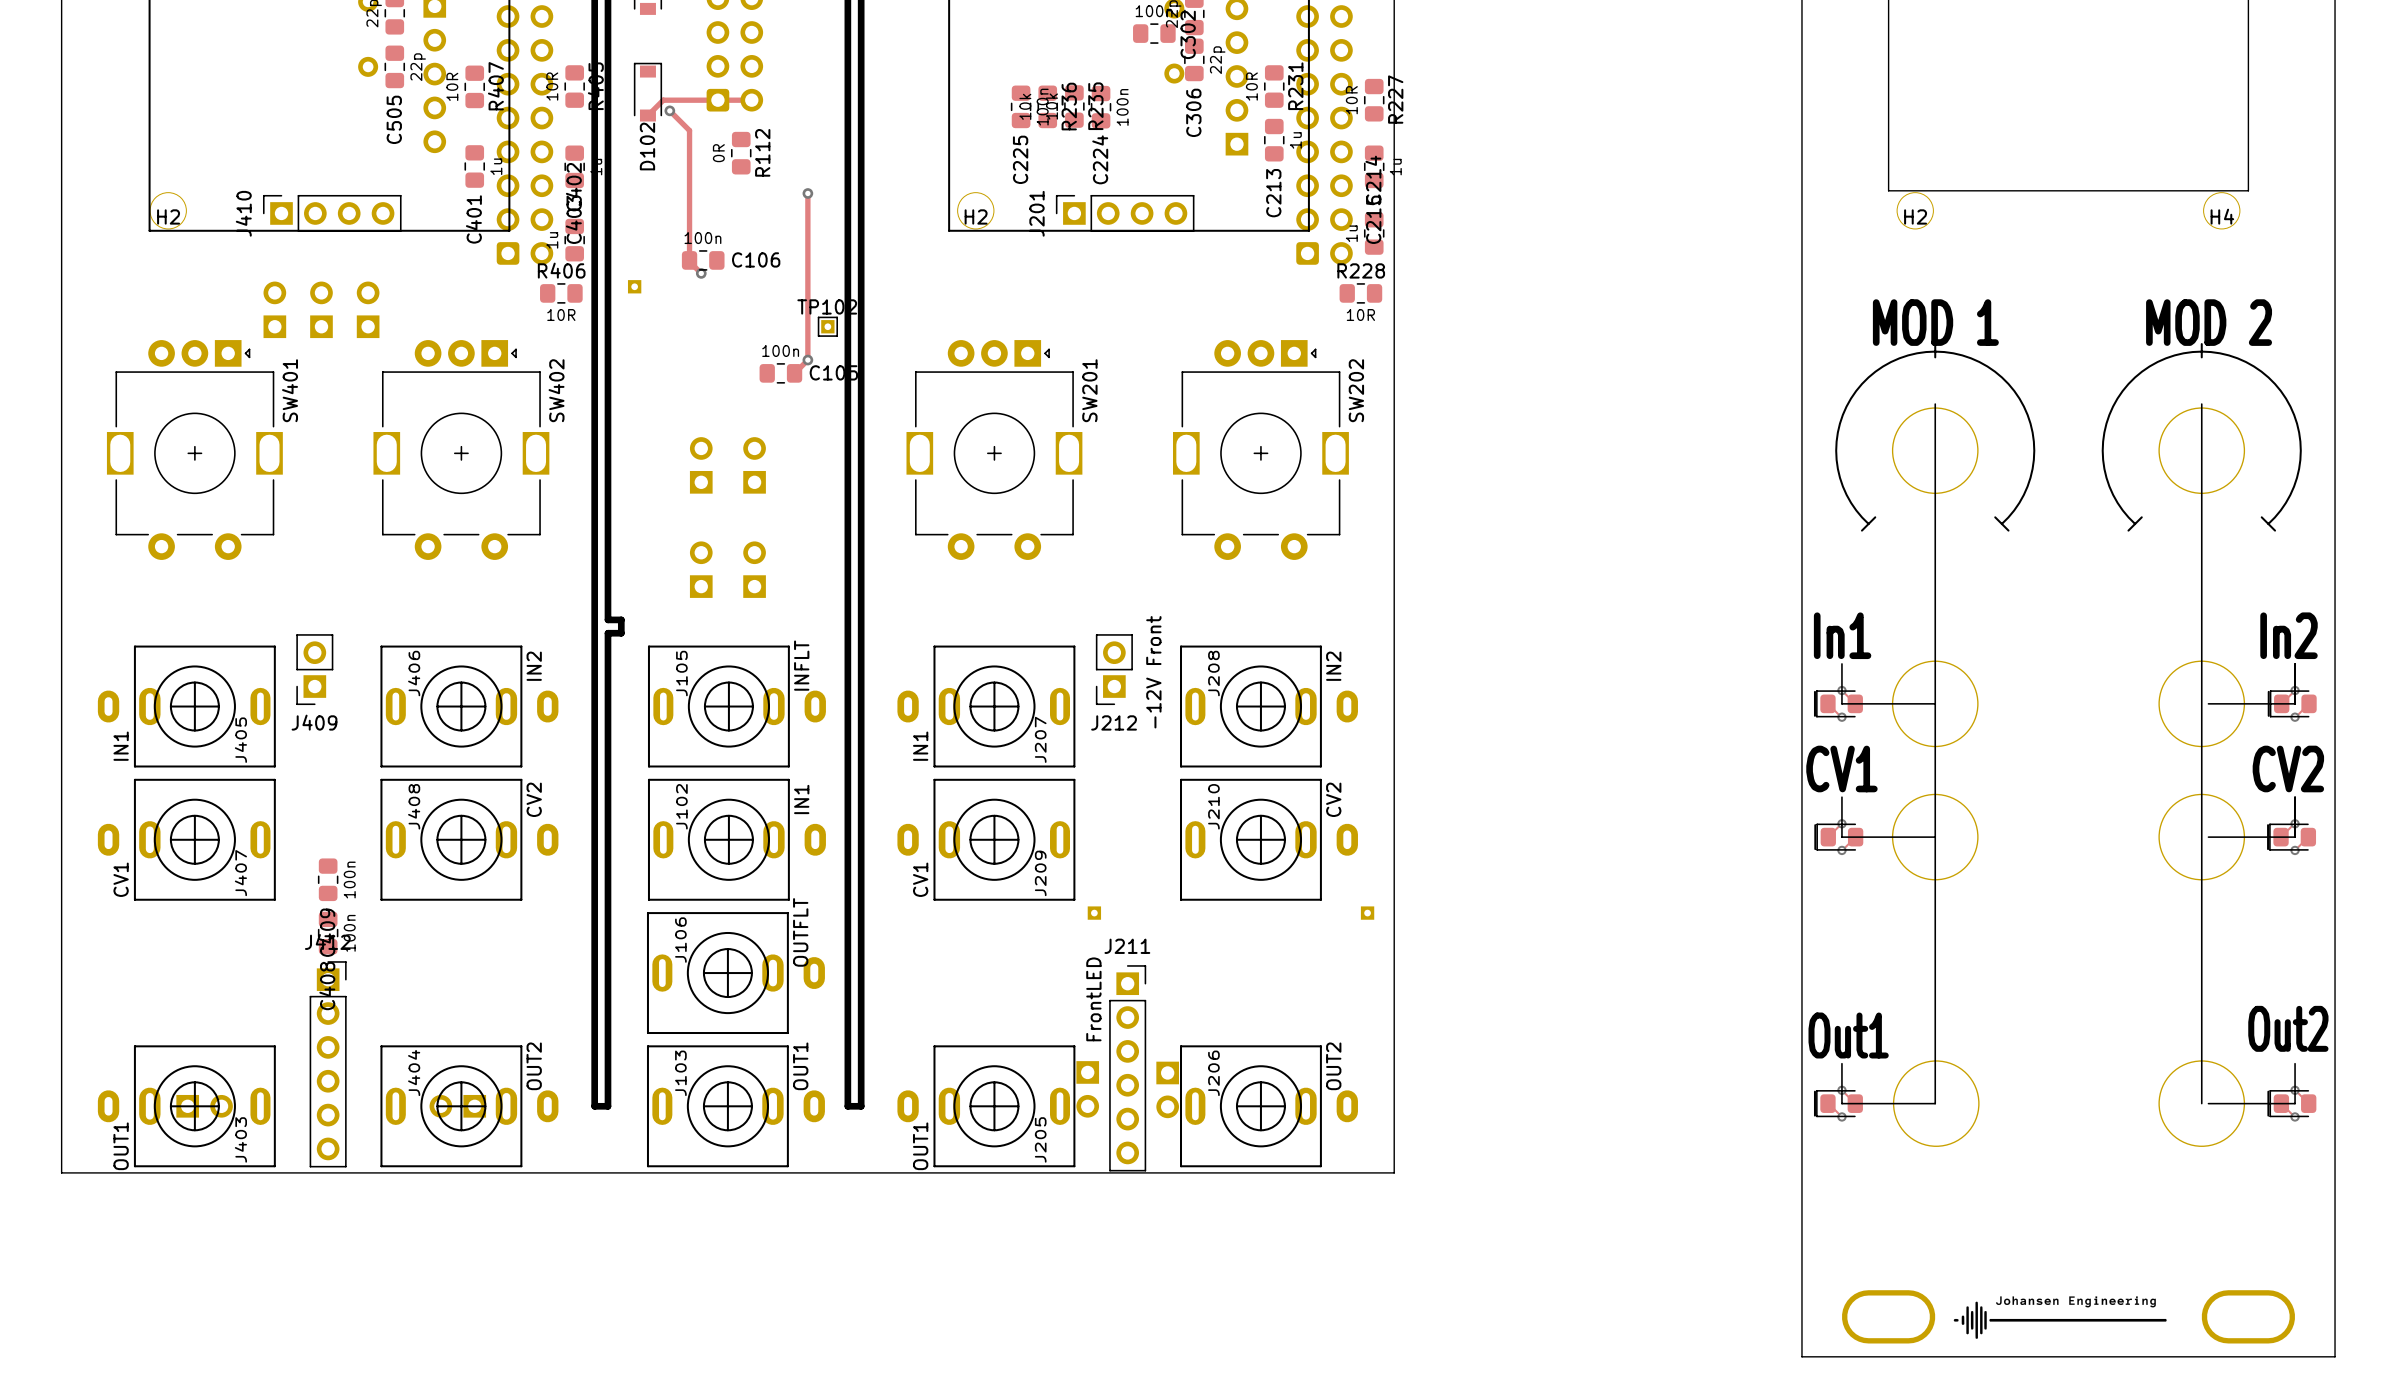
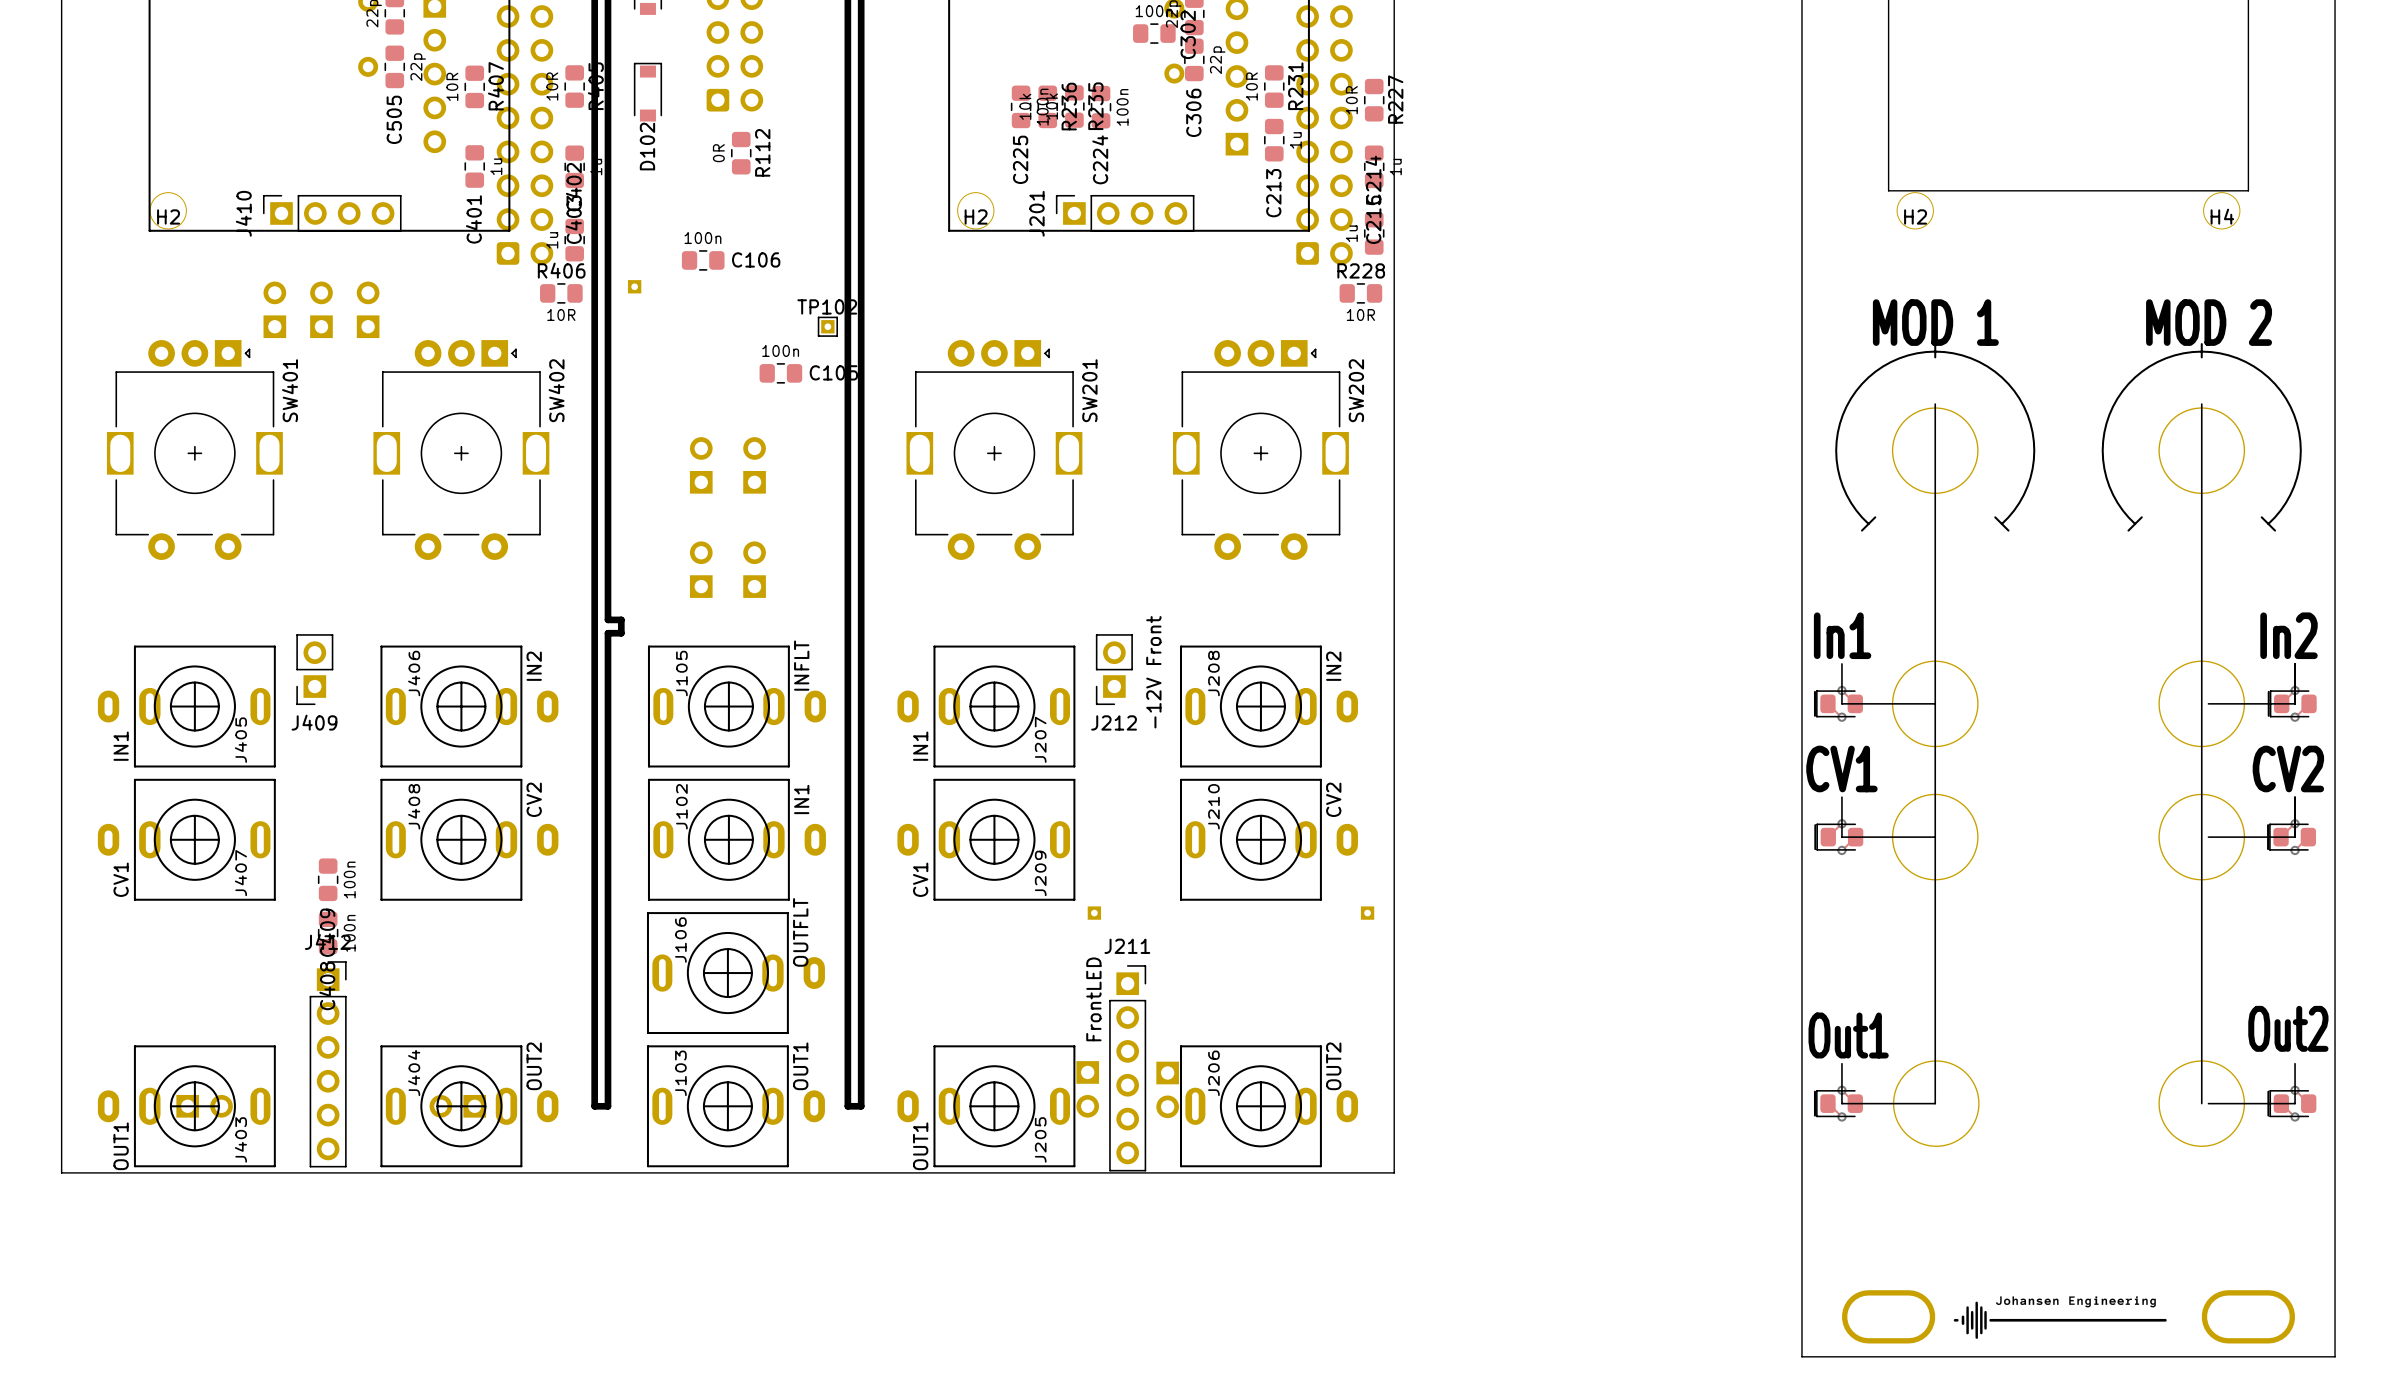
track: (751, 100) (663, 100) (647, 115) -> none
track: (669, 110) (689, 130) (689, 261) (701, 273) -> none
via: (669, 110) -> none
track: (807, 193) (807, 360) (794, 373) -> none
via: (807, 193) -> none
via: (701, 273) -> none
via: (807, 360) -> none

